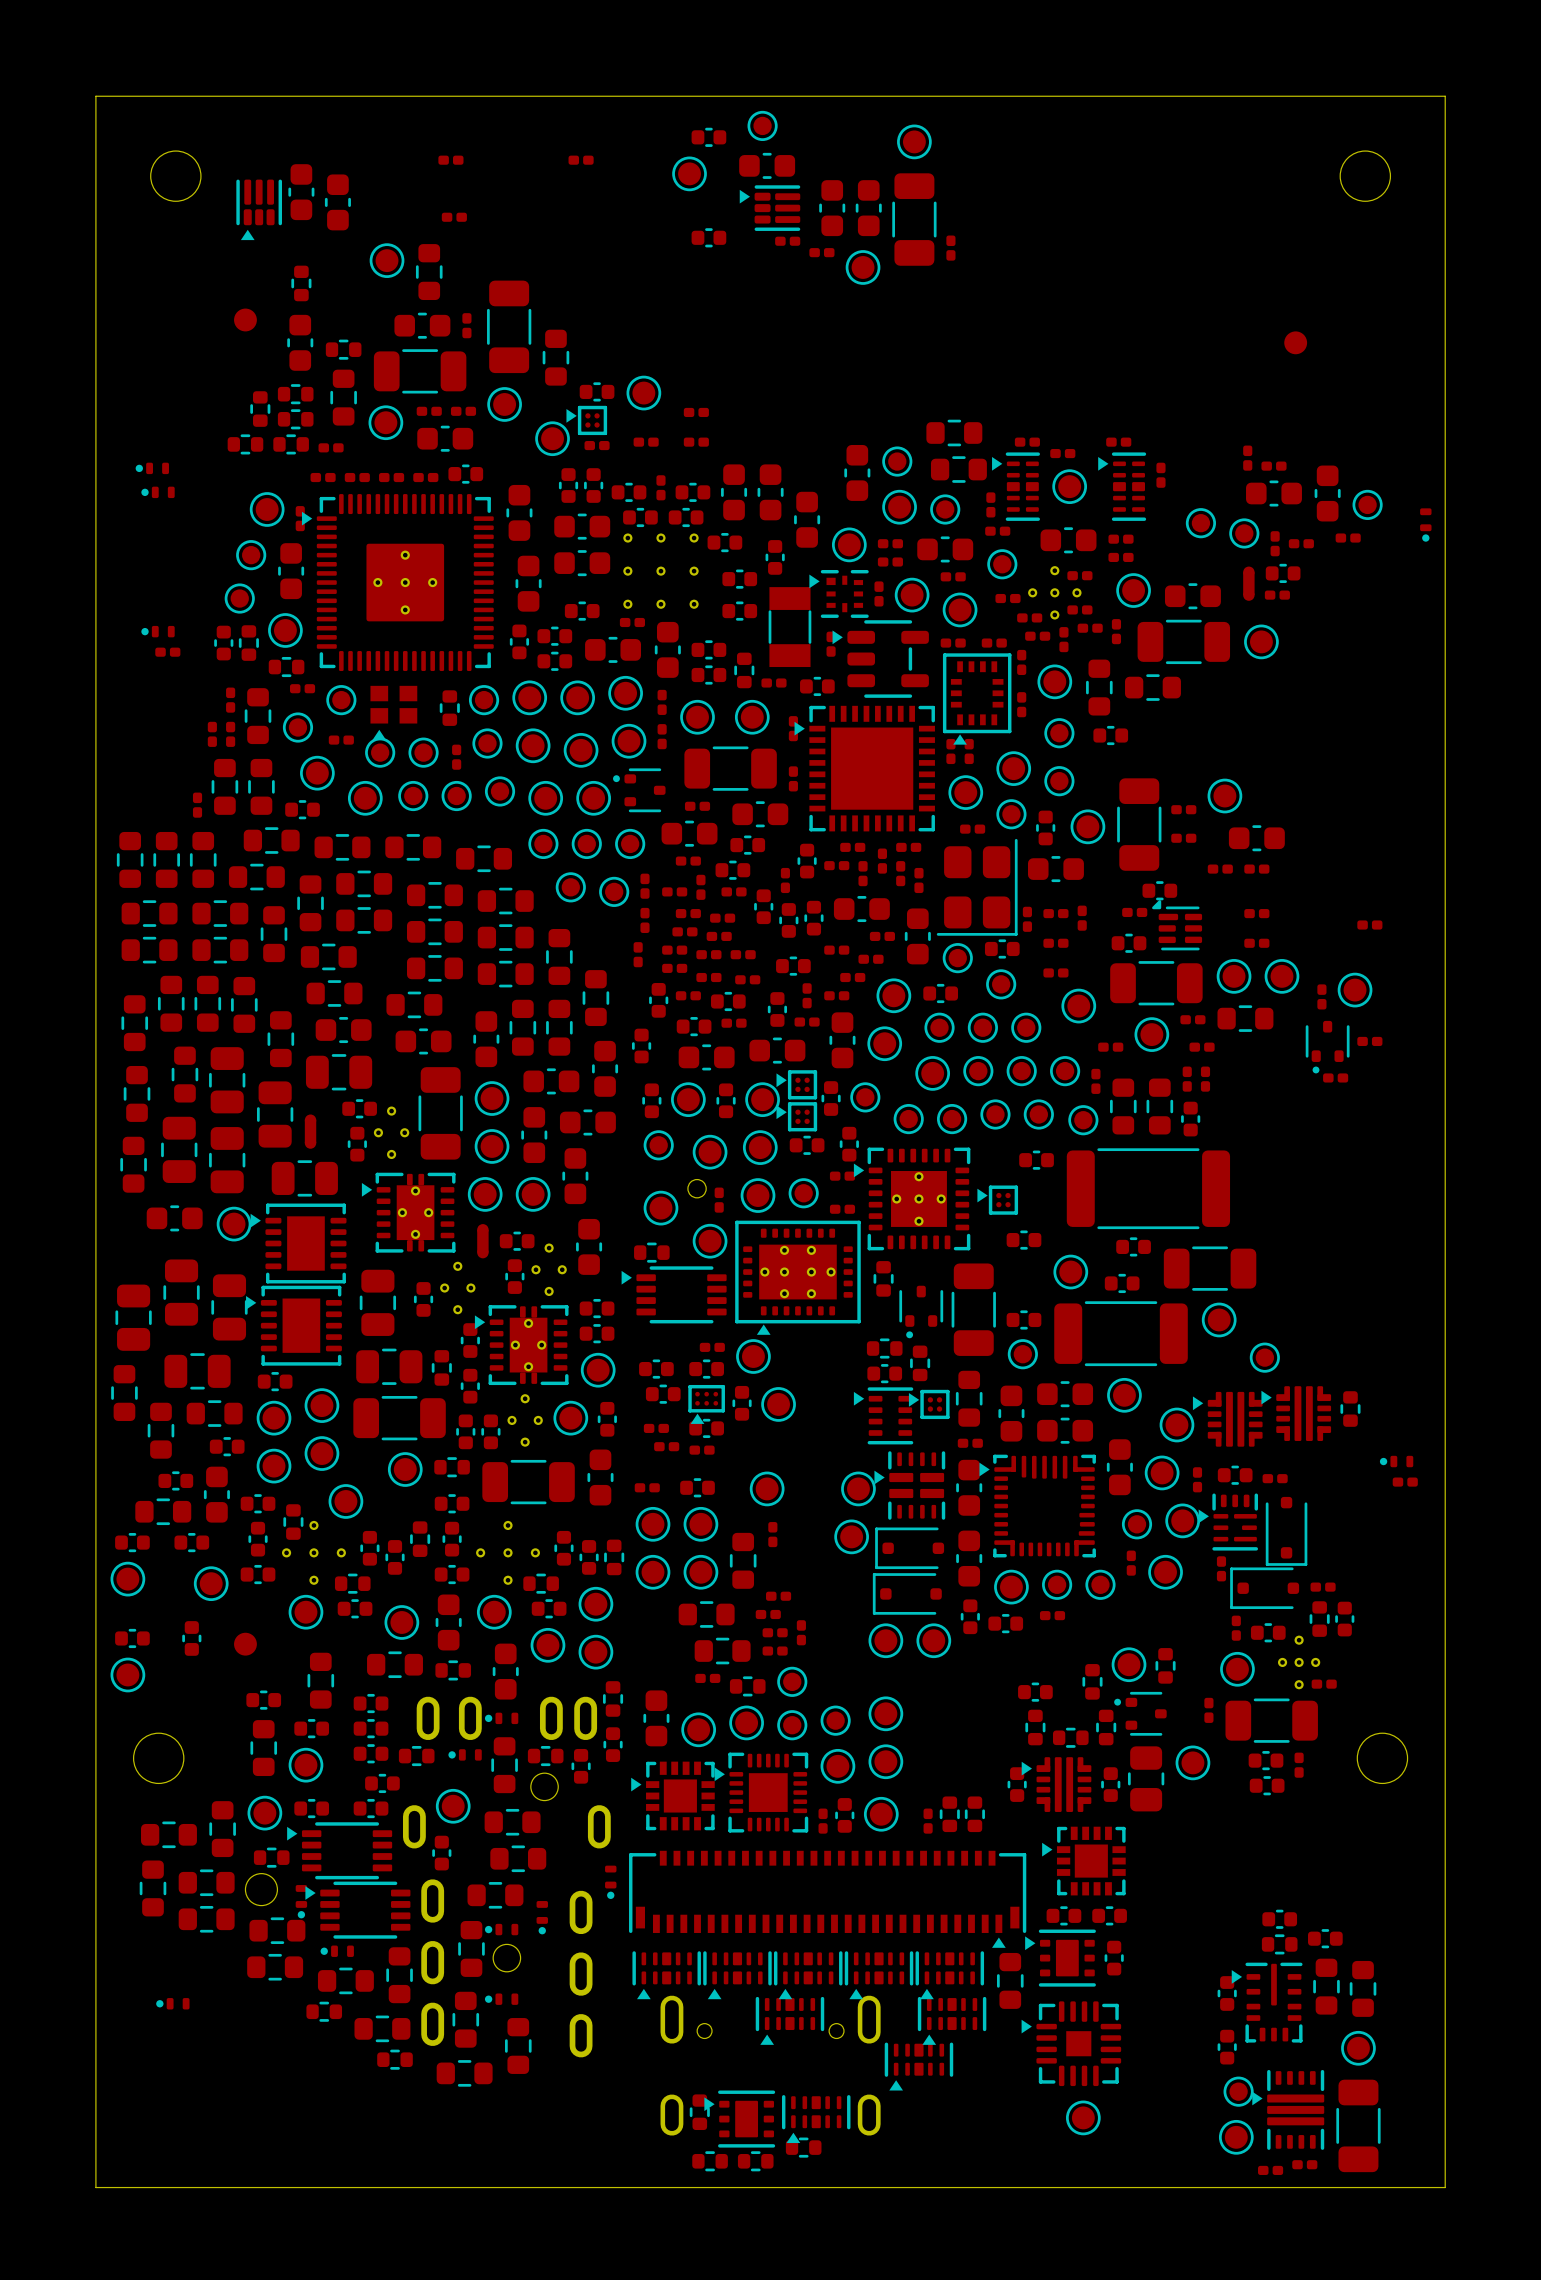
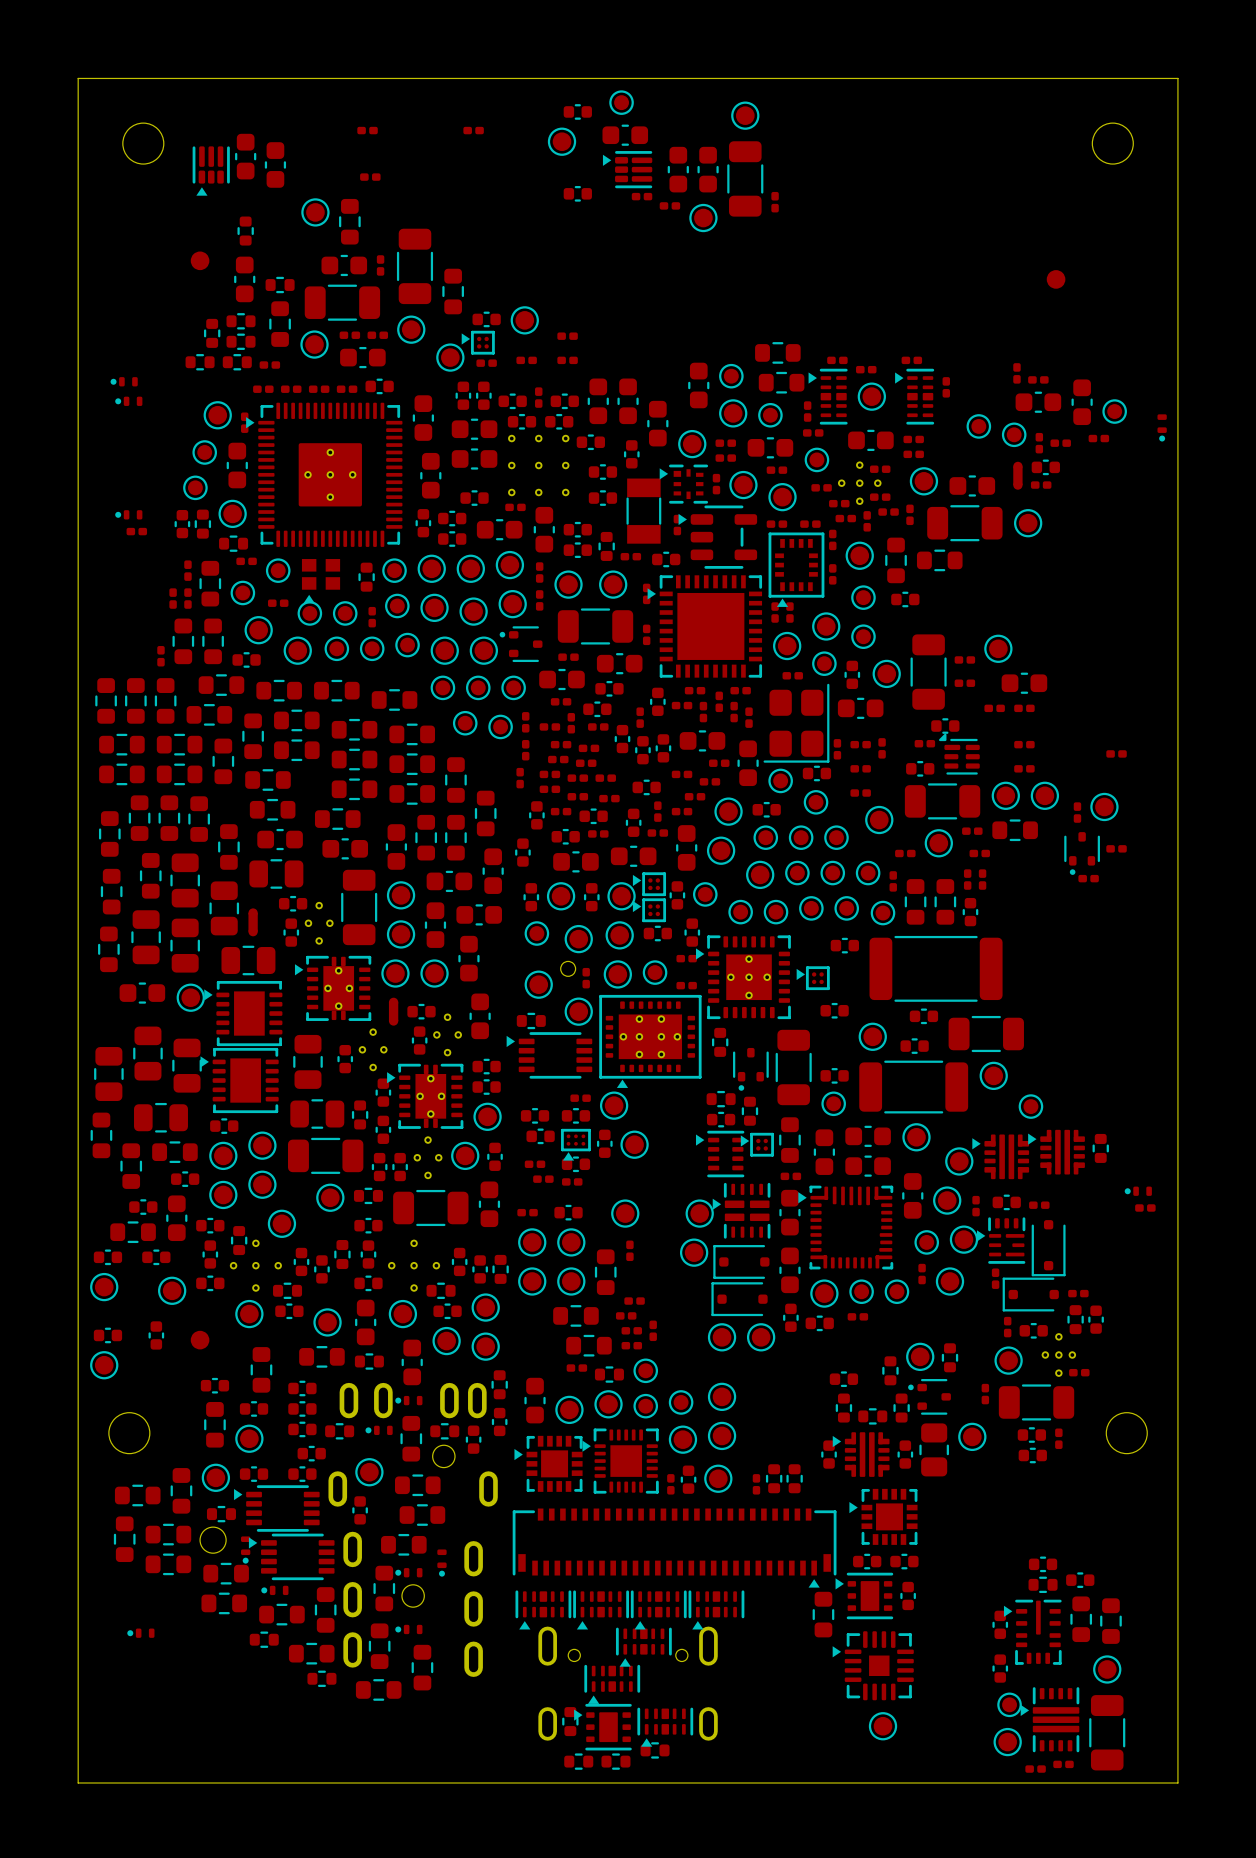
part: (610, 1882) -> none
part: (949, 1975) -> none
part: (952, 2020) -> none
part: none -> (612, 1684)
part: (918, 2066) -> none

